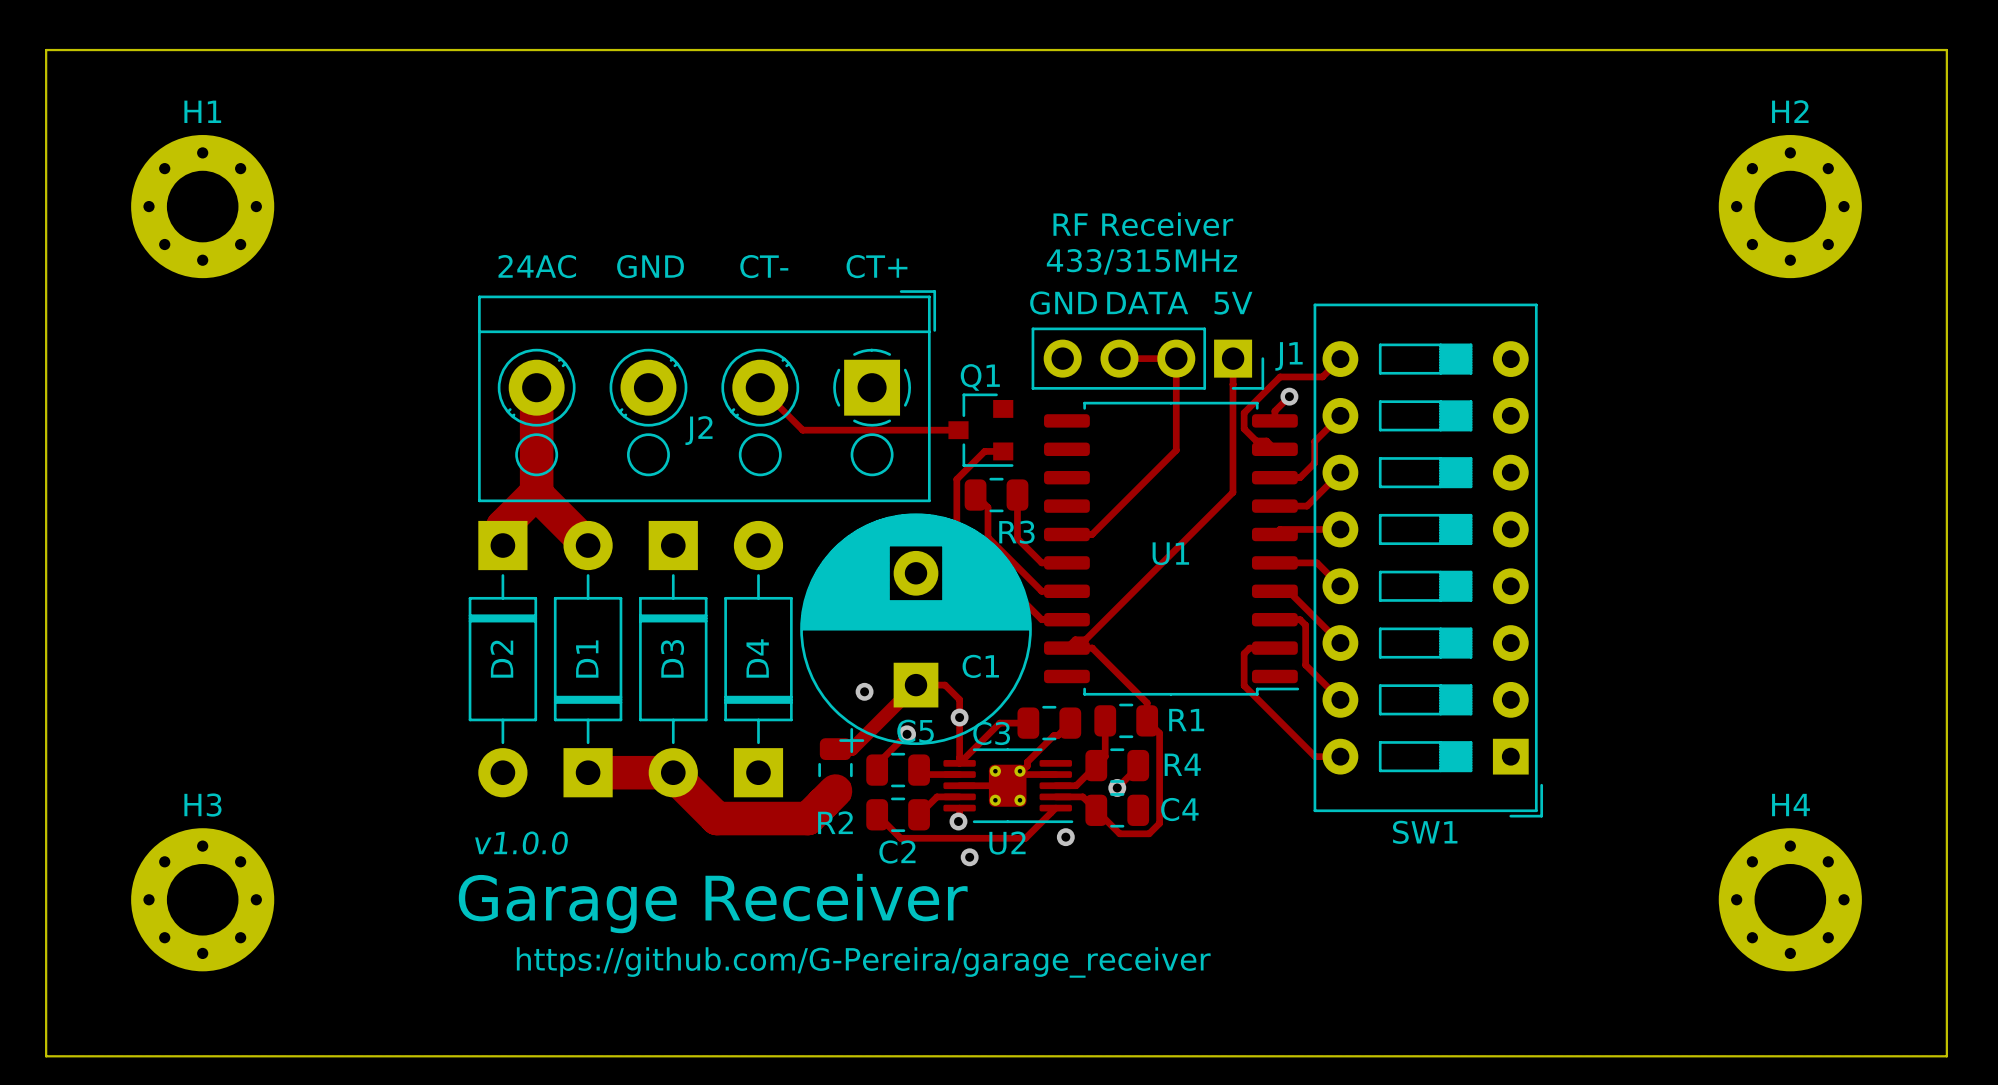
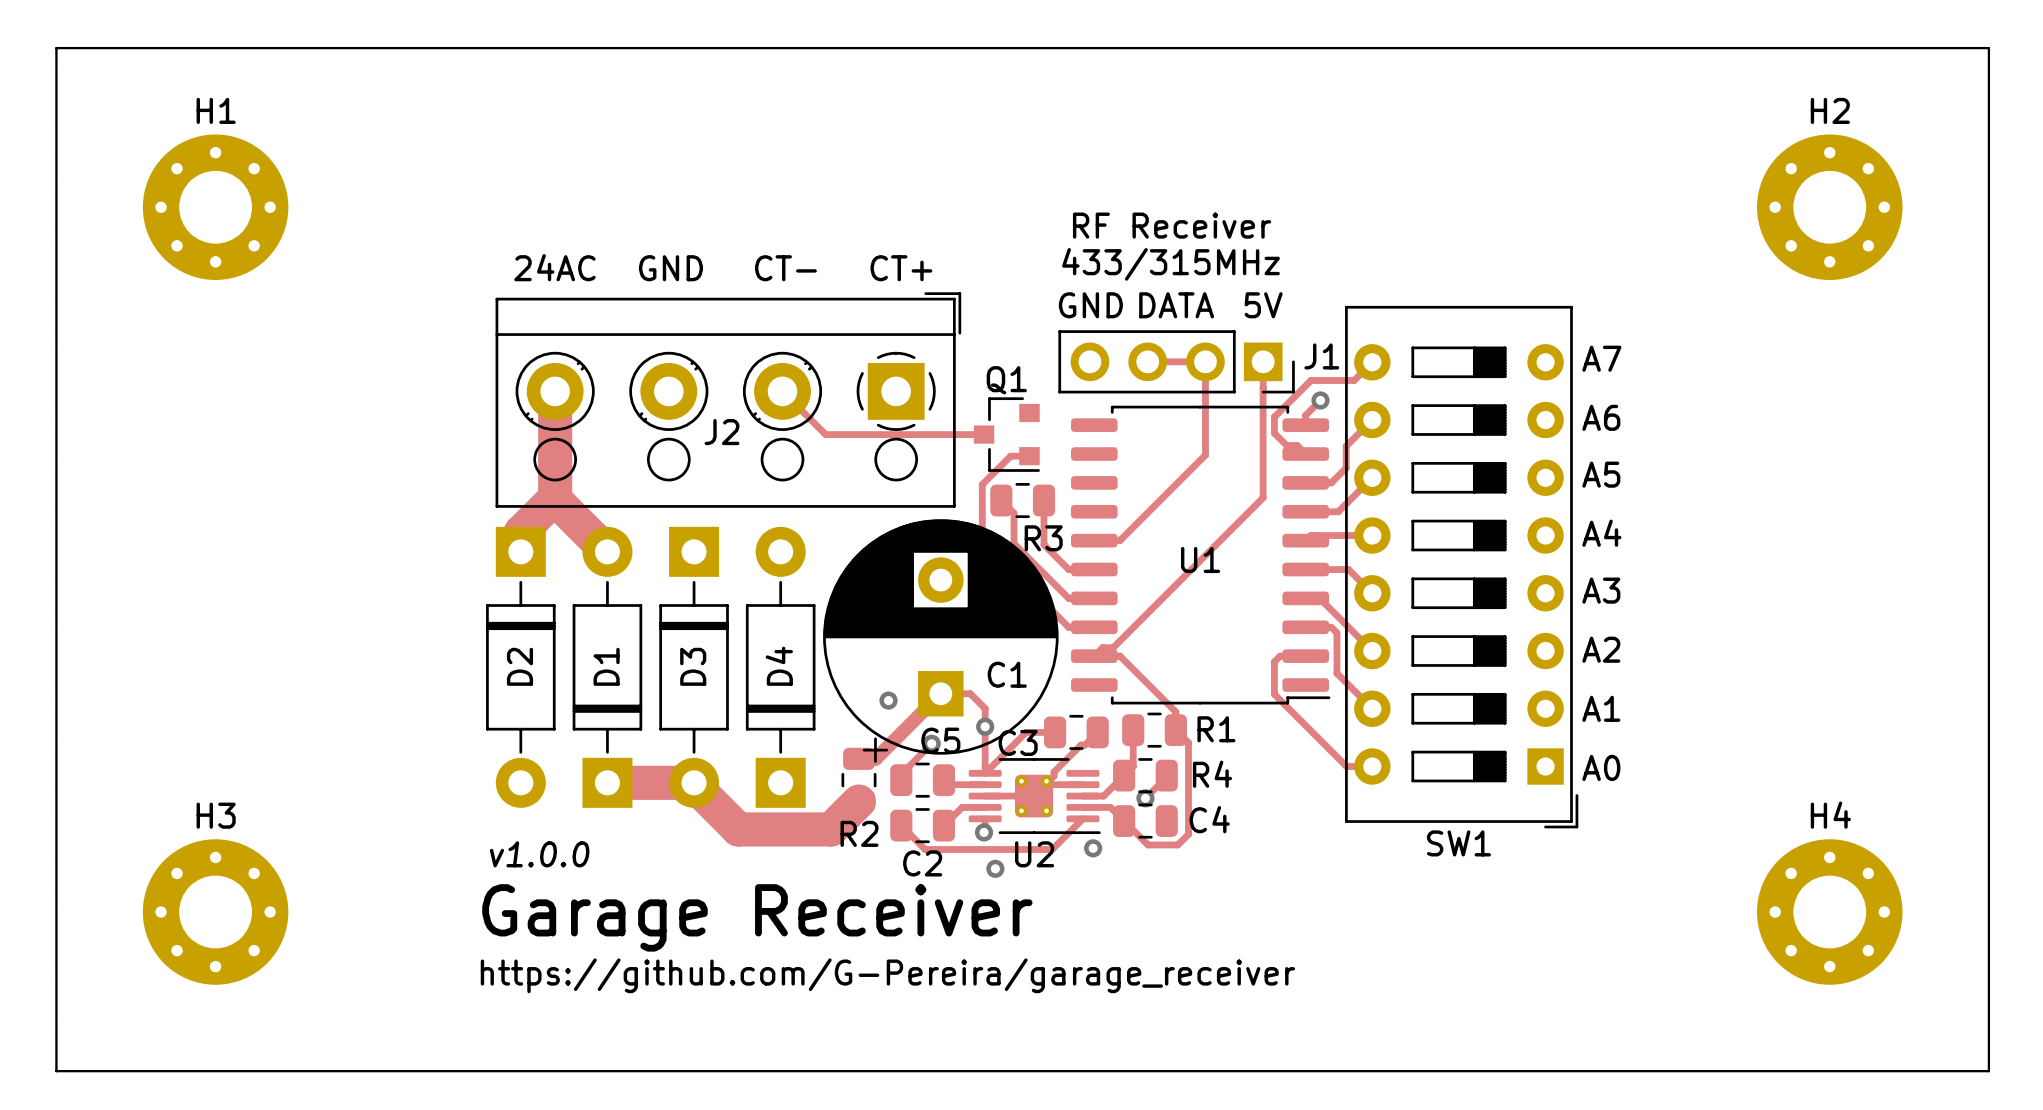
text: none -> A7 (1601, 358)
text: none -> A6 (1601, 417)
text: none -> A5 (1601, 474)
text: none -> A4 (1601, 533)
text: none -> A3 (1601, 590)
text: none -> A2 (1601, 649)
text: none -> A1 (1601, 708)
text: none -> A0 (1601, 767)

